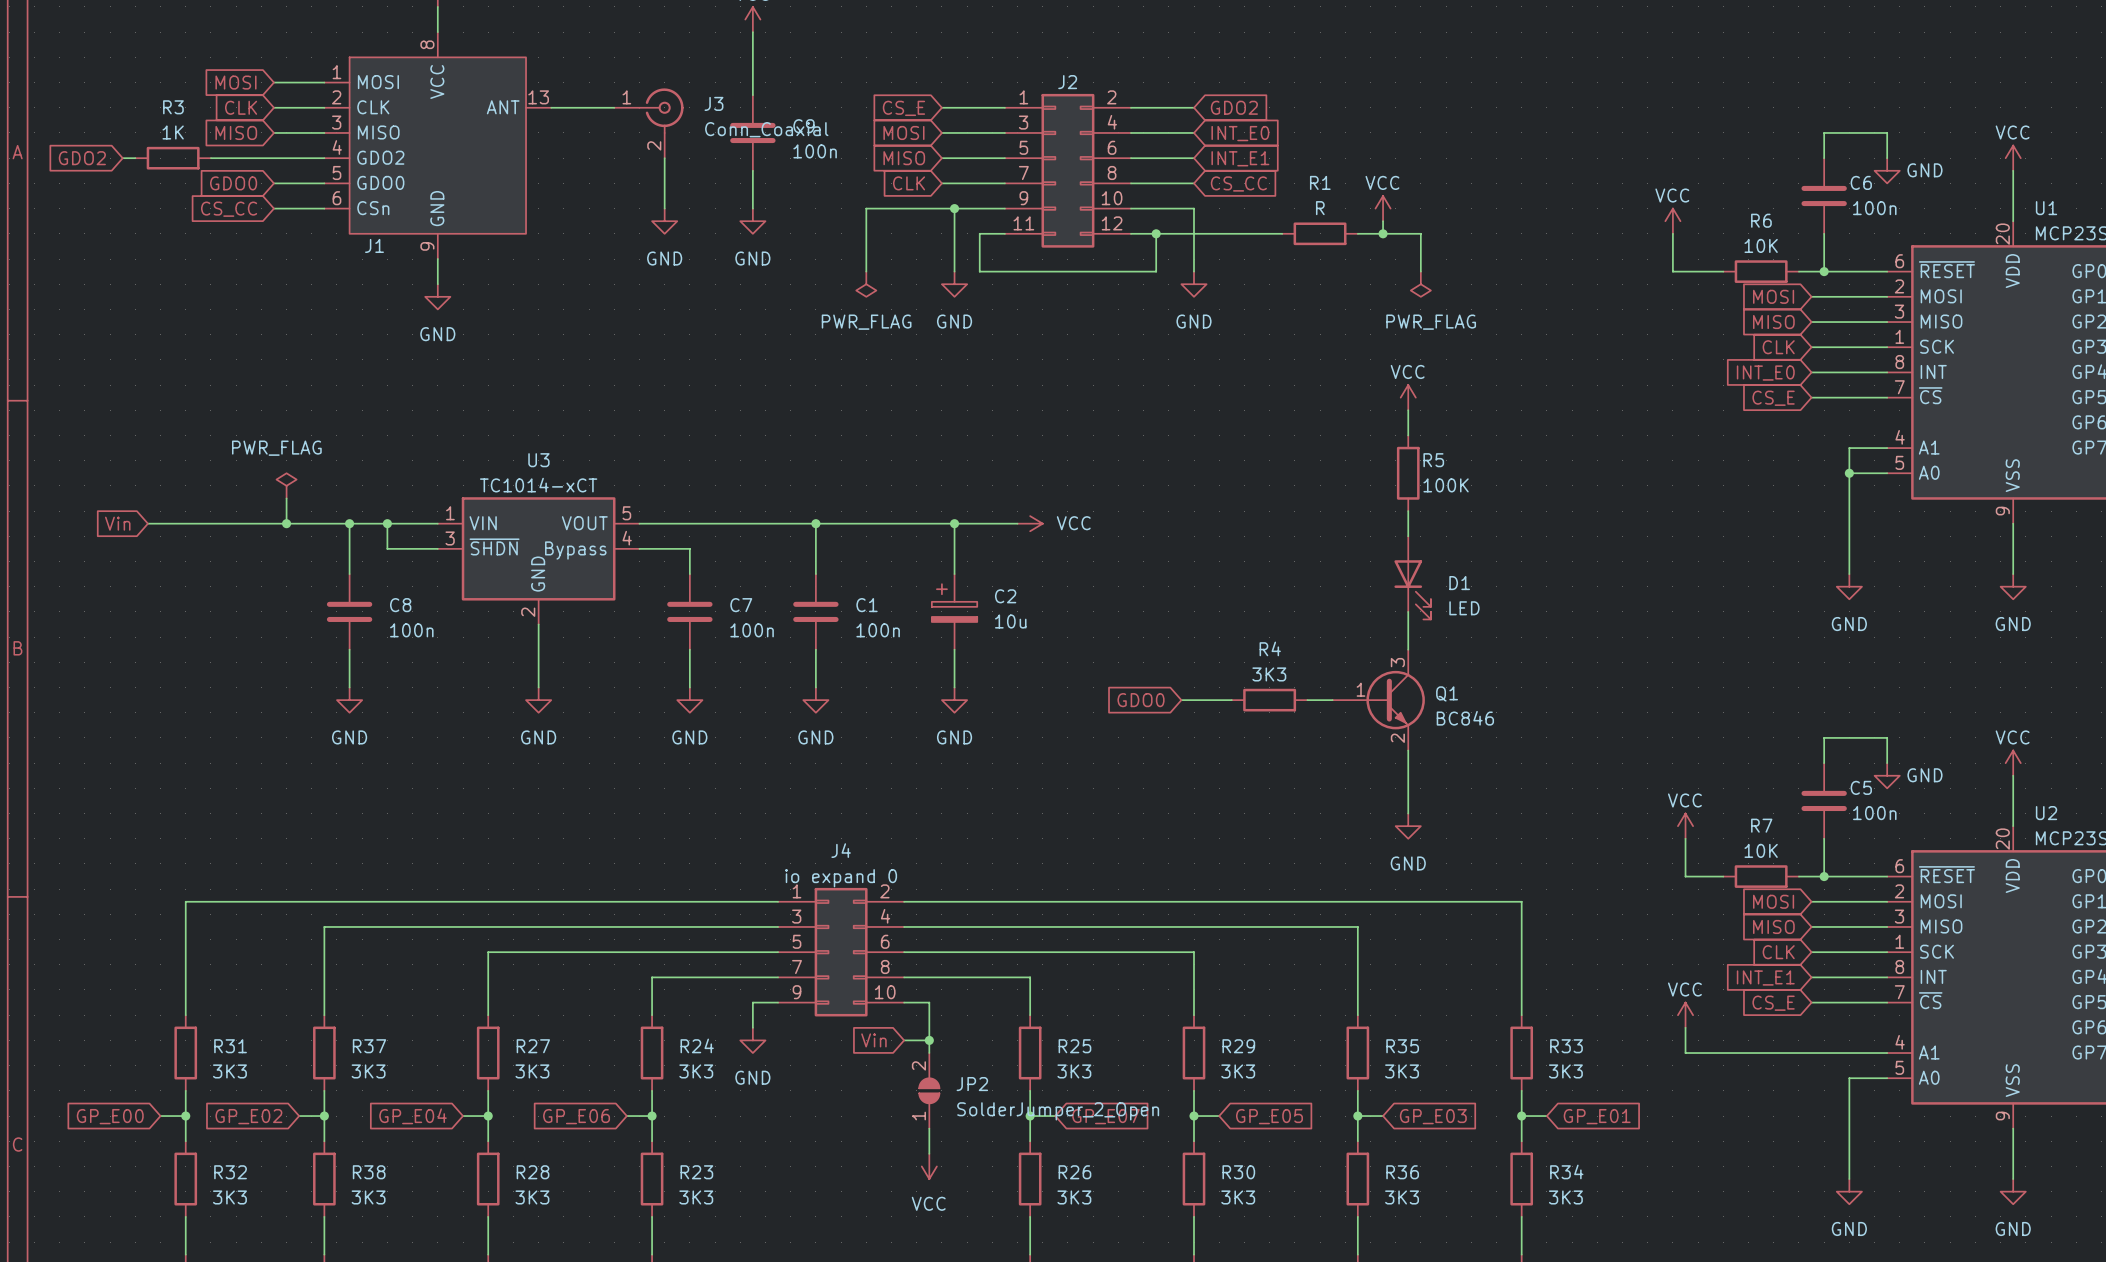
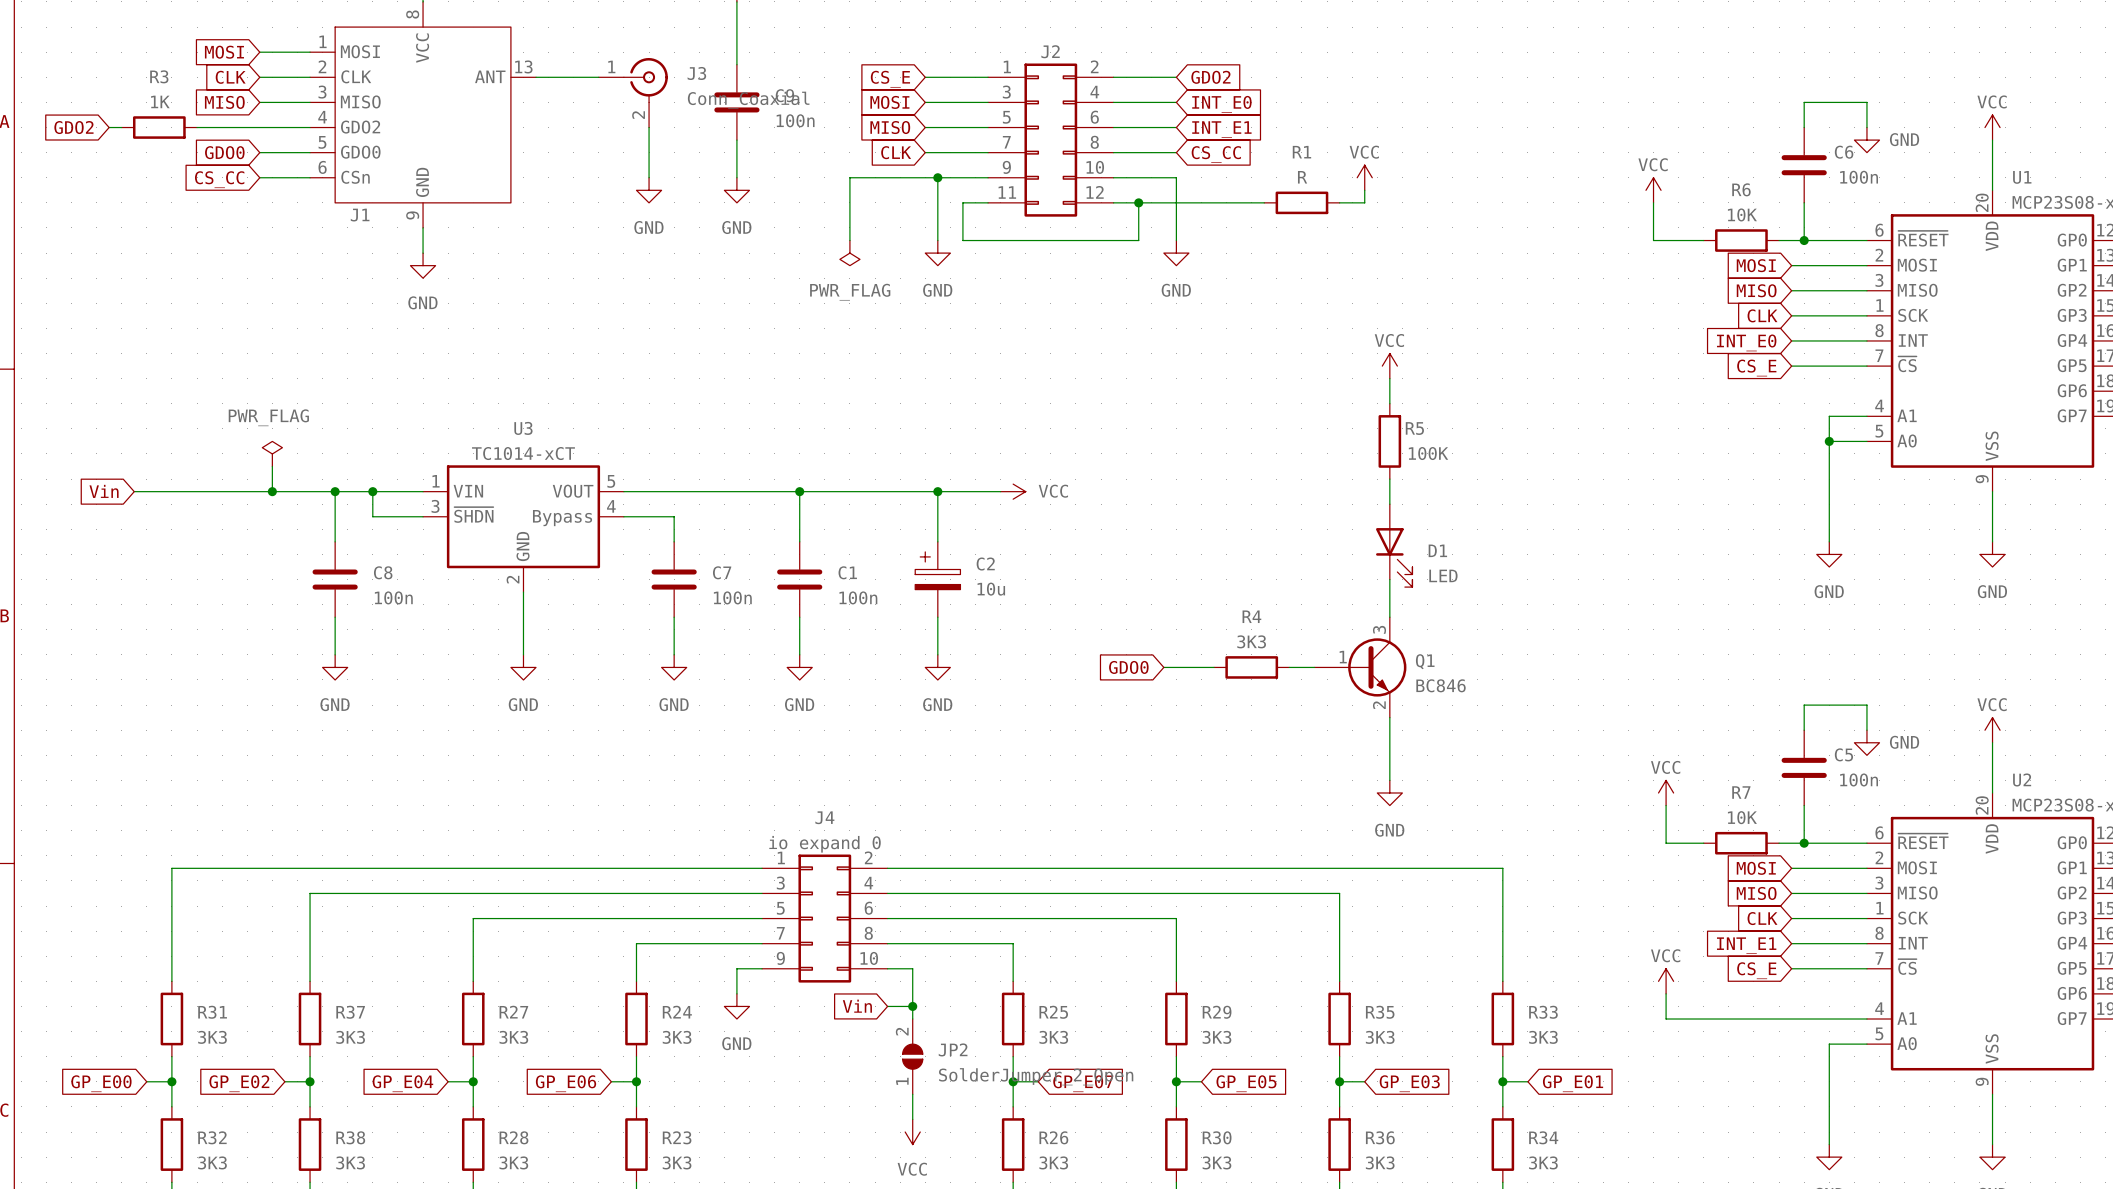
wire: (1383, 233) (1420, 233) (1420, 271) -> none
junction: (1383, 233) -> none
power symbol: PWR_FLAG (1420, 284) -> none

